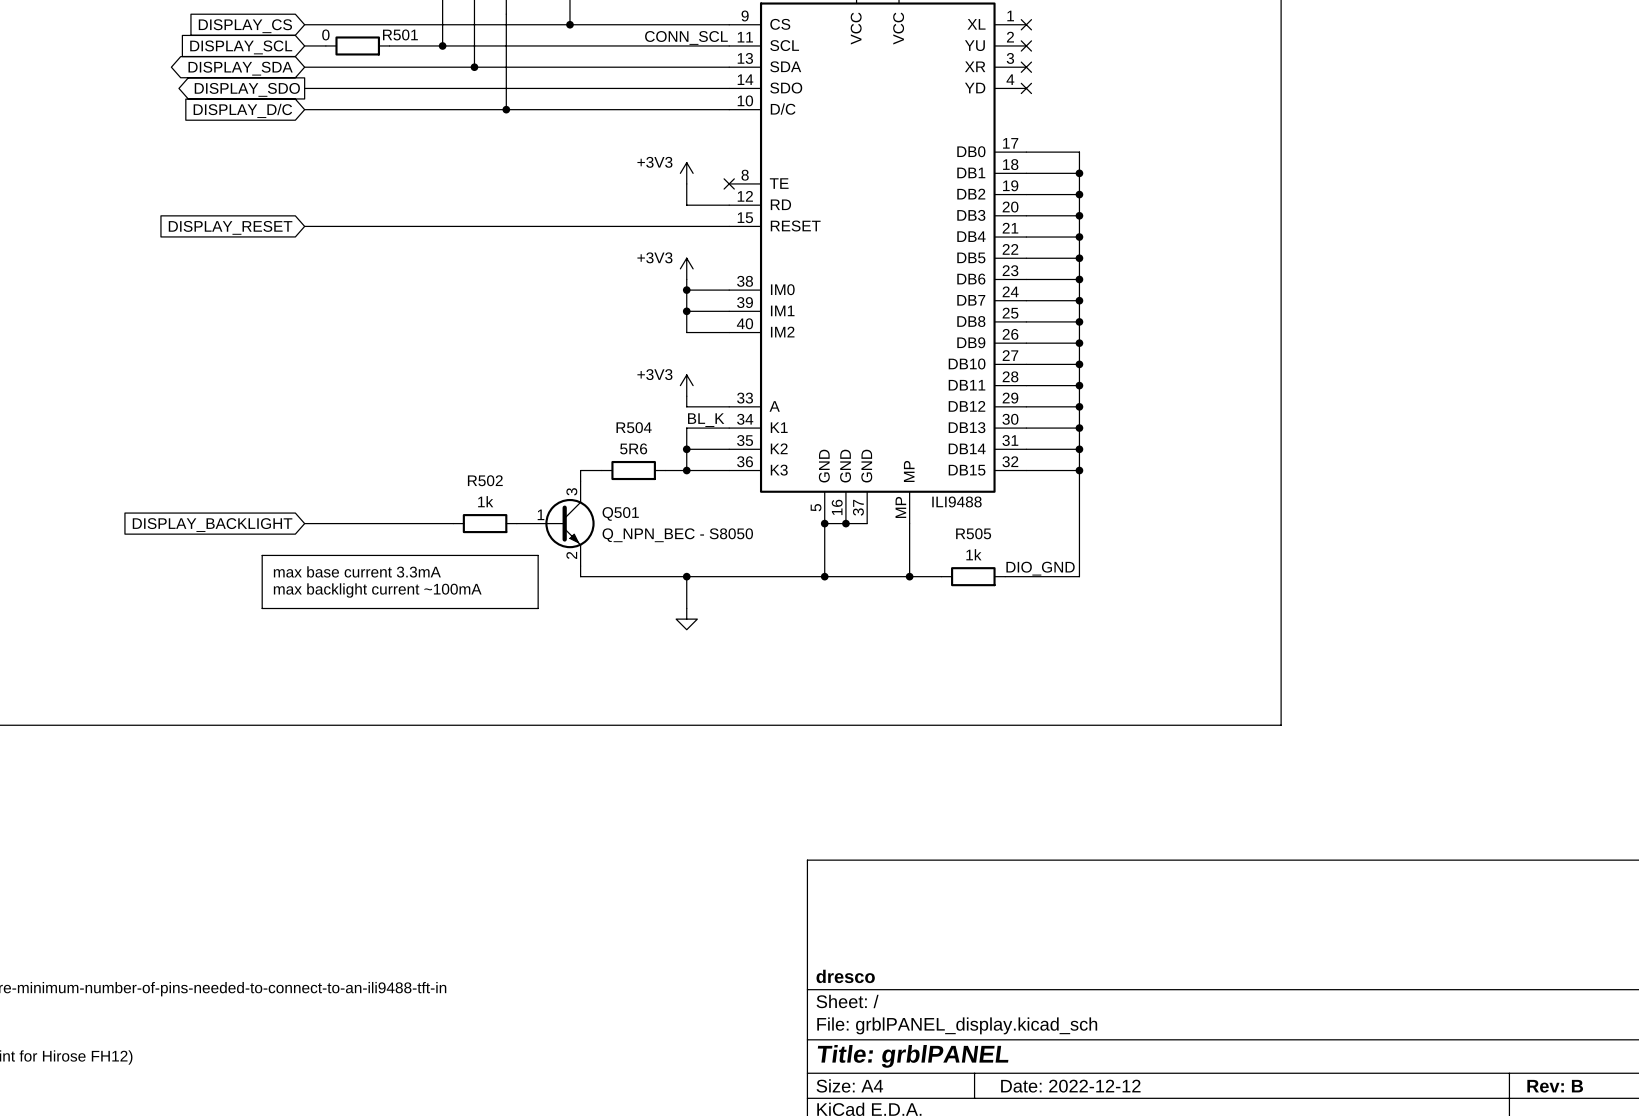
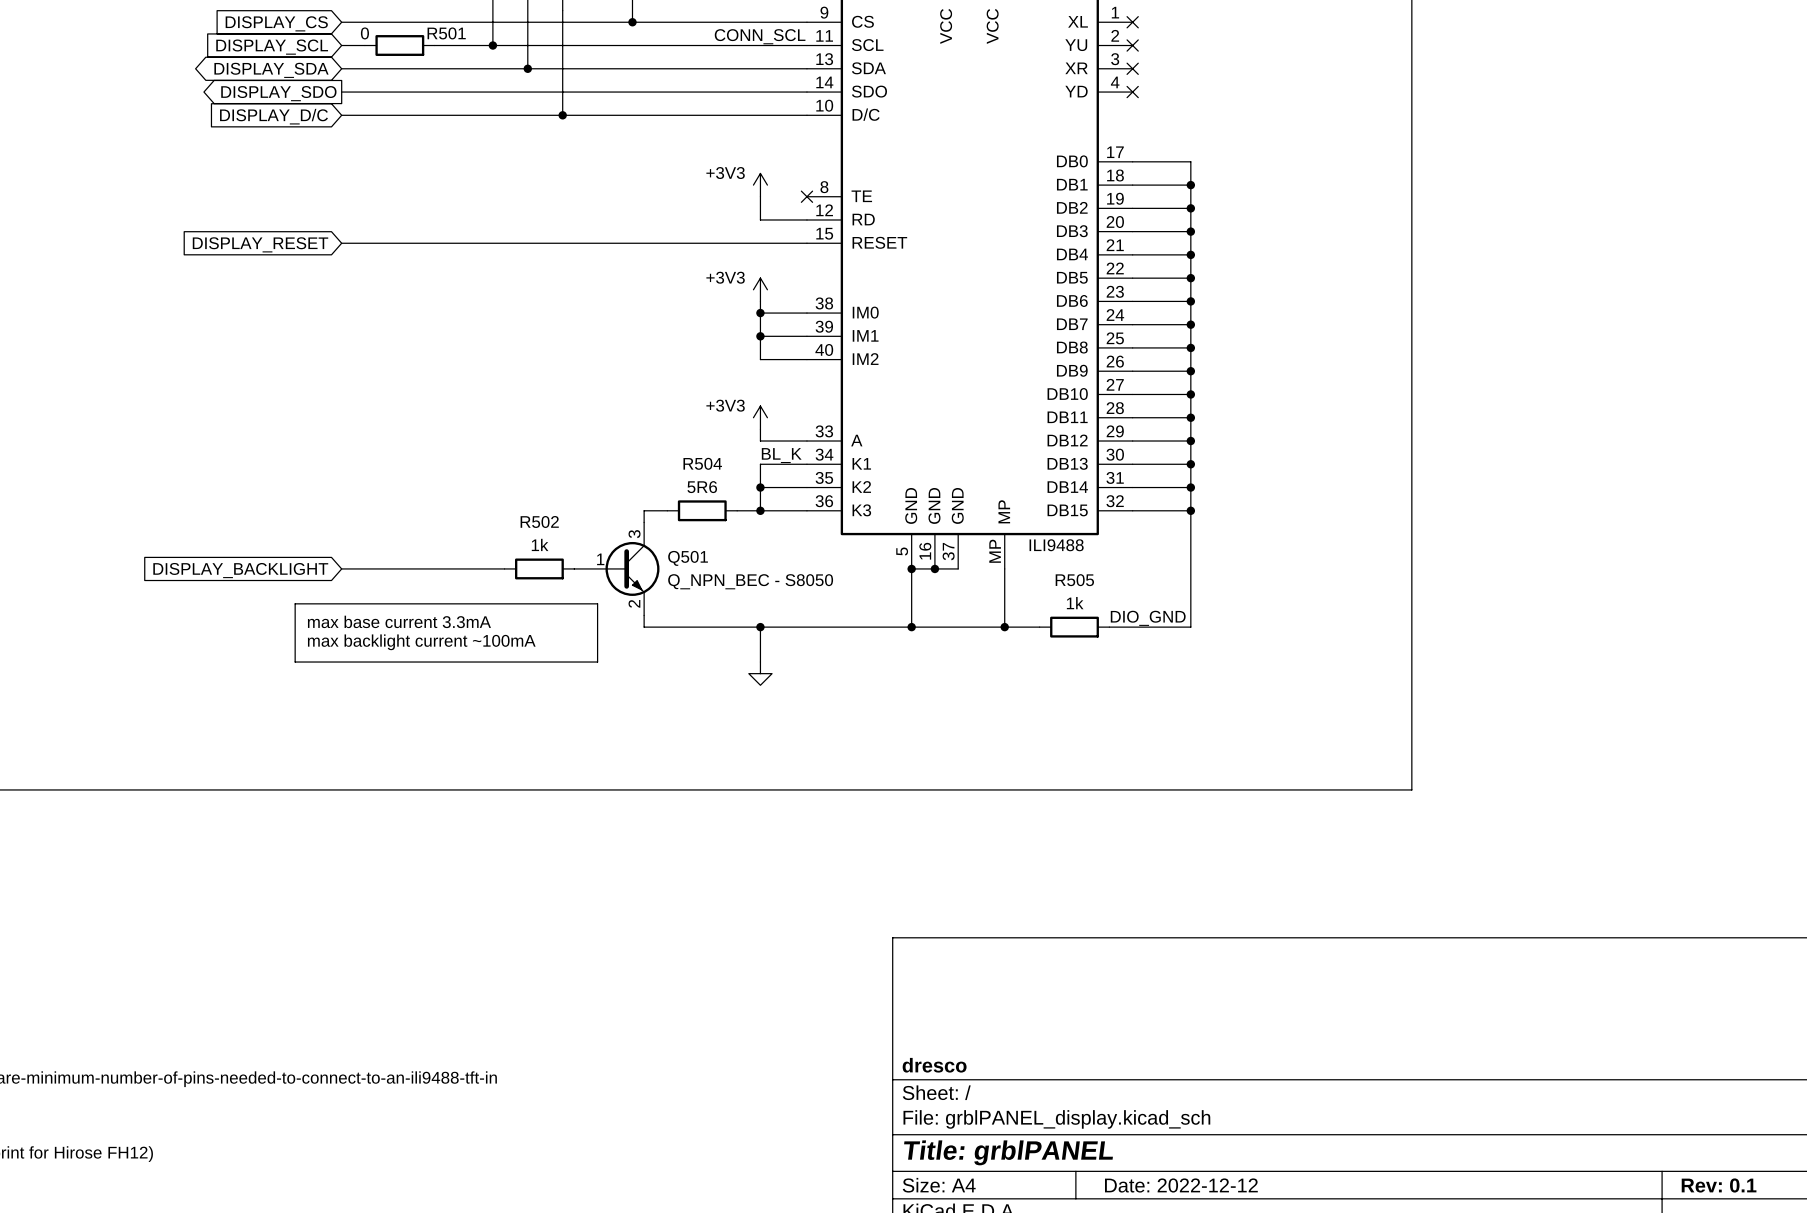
title block: Rev: B (1555, 1086) -> Rev: 0.1 (1719, 1185)

